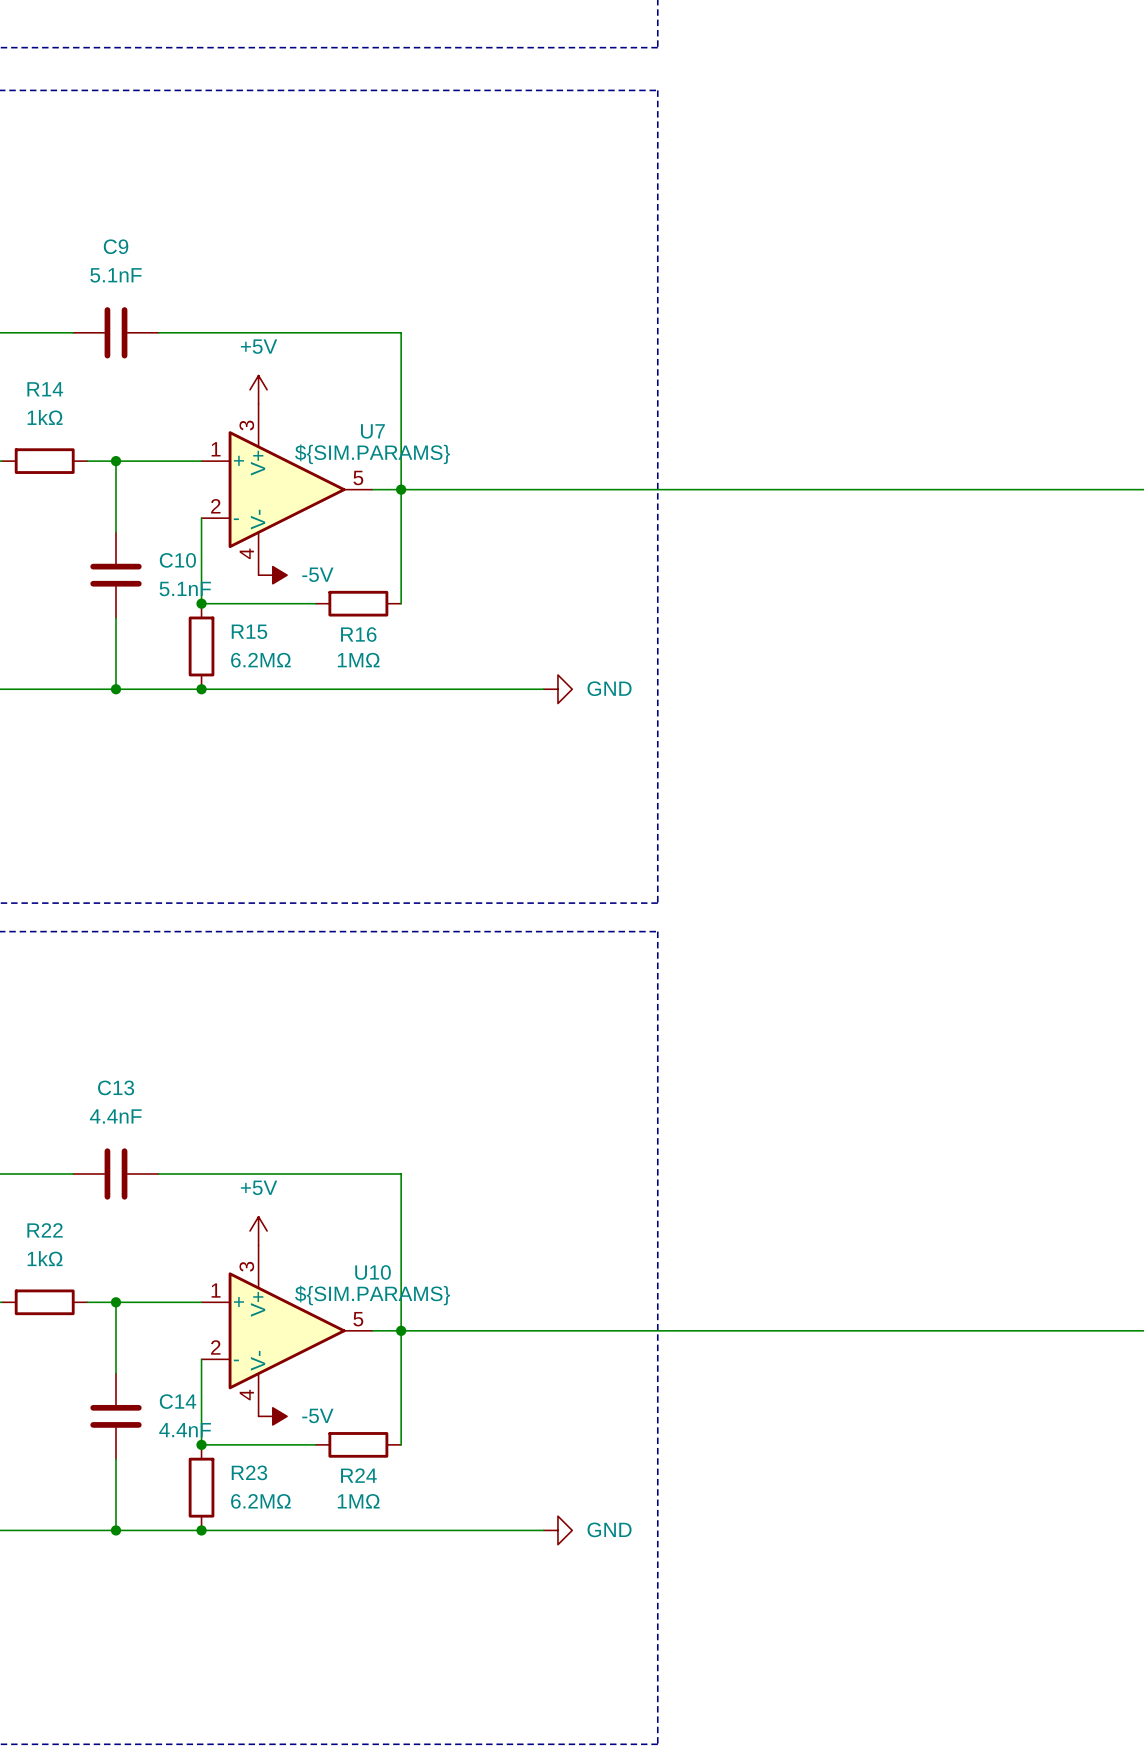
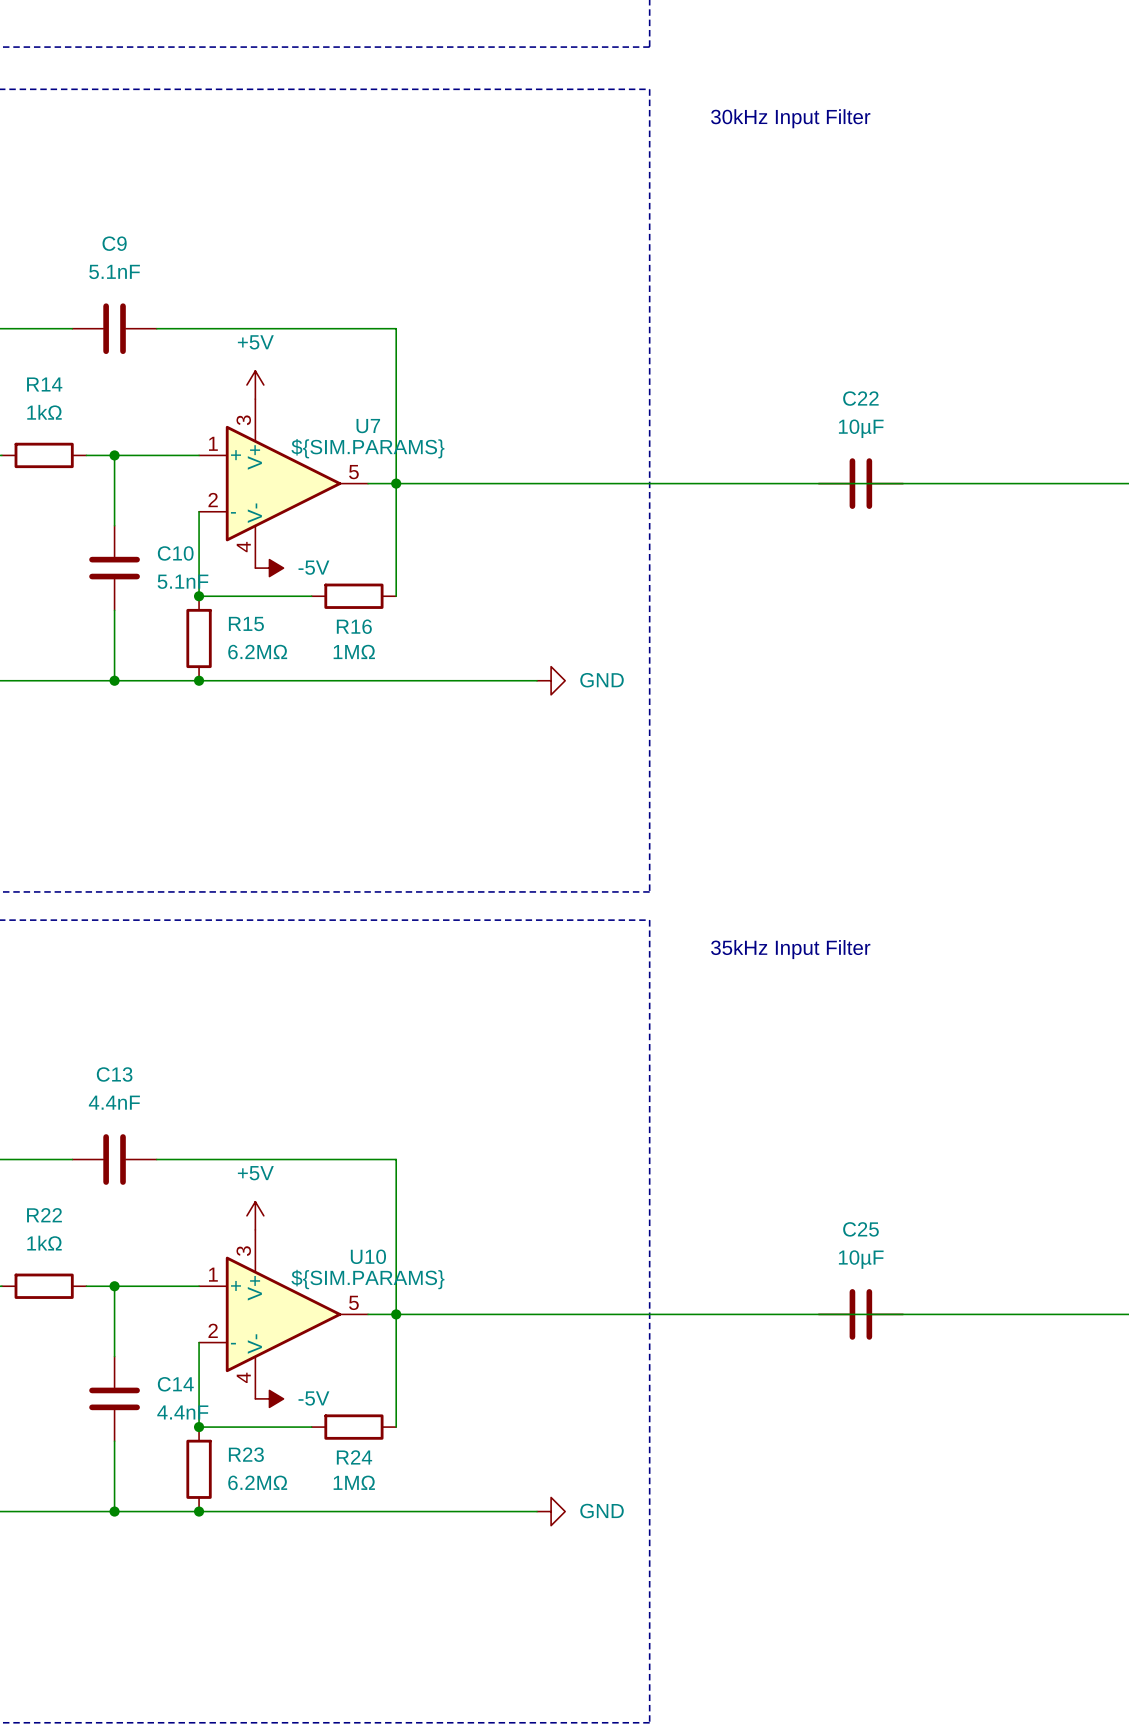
text: none -> 30kHz Input Filter (790, 118)
C22: none -> 10µF (860, 483)
text: none -> 35kHz Input Filter (790, 949)
C25: none -> 10µF (860, 1314)

